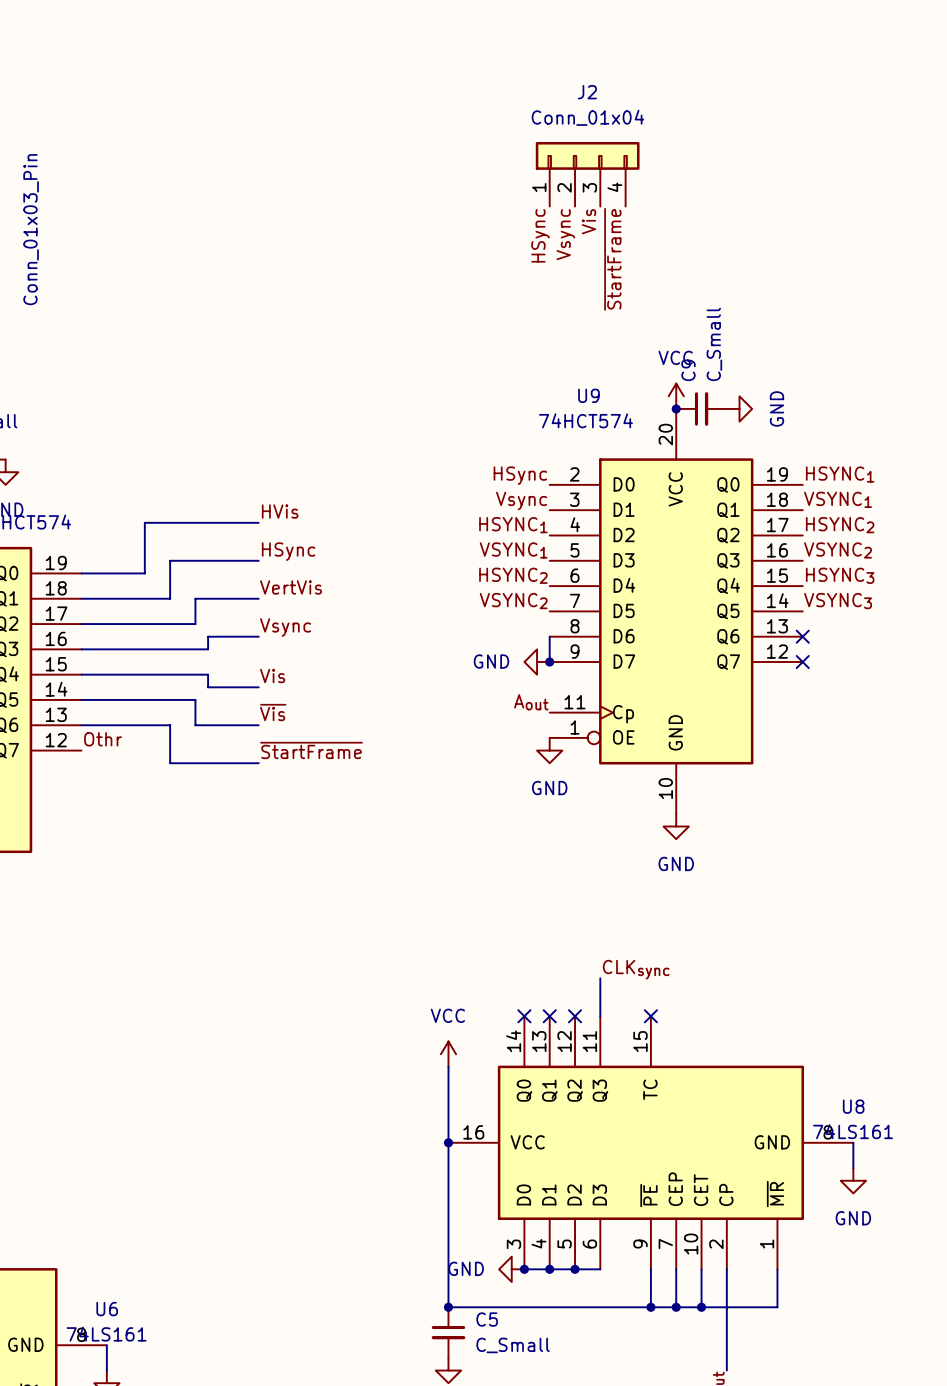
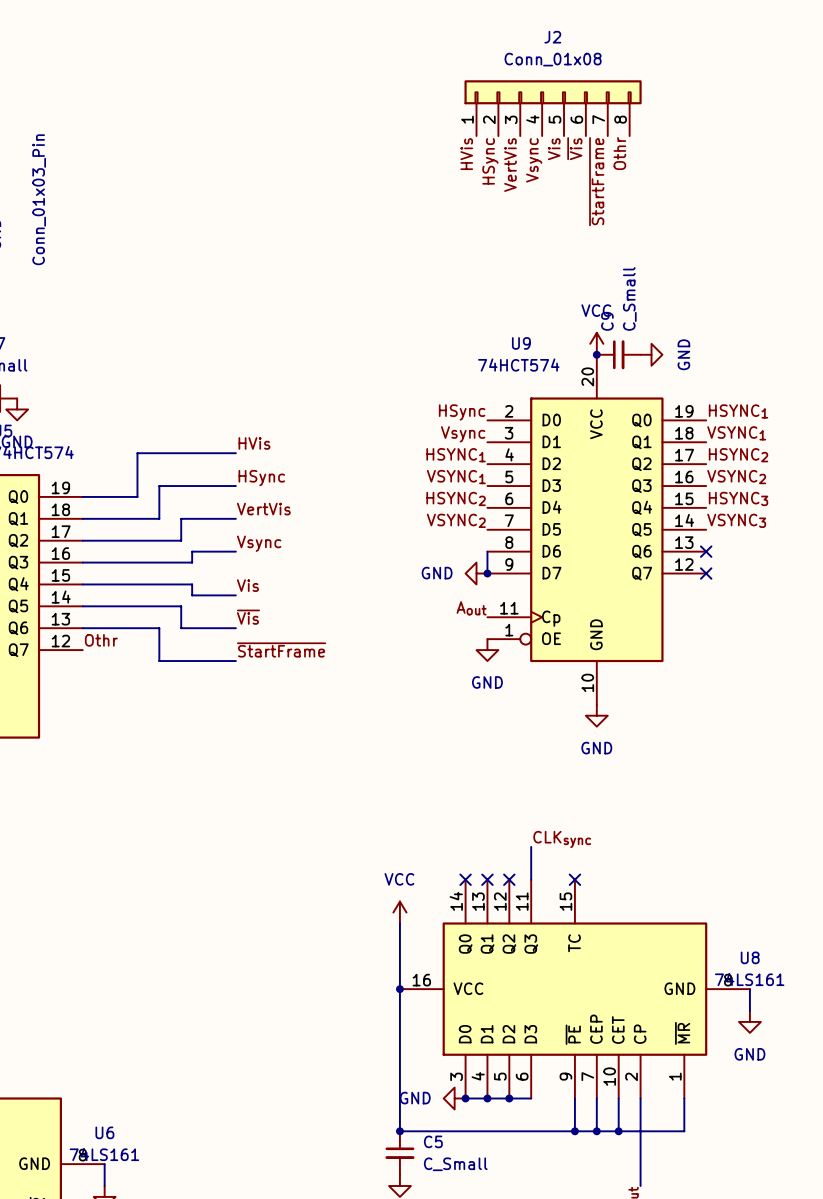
J2 value: Conn_01x04 (587, 117) -> Conn_01x08 (553, 59)
J2 symbol: [535, 142, 640, 207] -> [464, 80, 642, 137]
label: none -> ~{Vis} (574, 148)
label: none -> HVis (466, 154)
label: none -> Othr (619, 153)
label: none -> VertVis (510, 165)
label position: Vis (589, 221) -> Vis (554, 149)
label position: Vsync (565, 234) -> Vsync (534, 160)
label position: HSync (540, 235) -> HSync (490, 161)
label position: ~{StartFrame} (612, 259) -> ~{StartFrame} (596, 181)

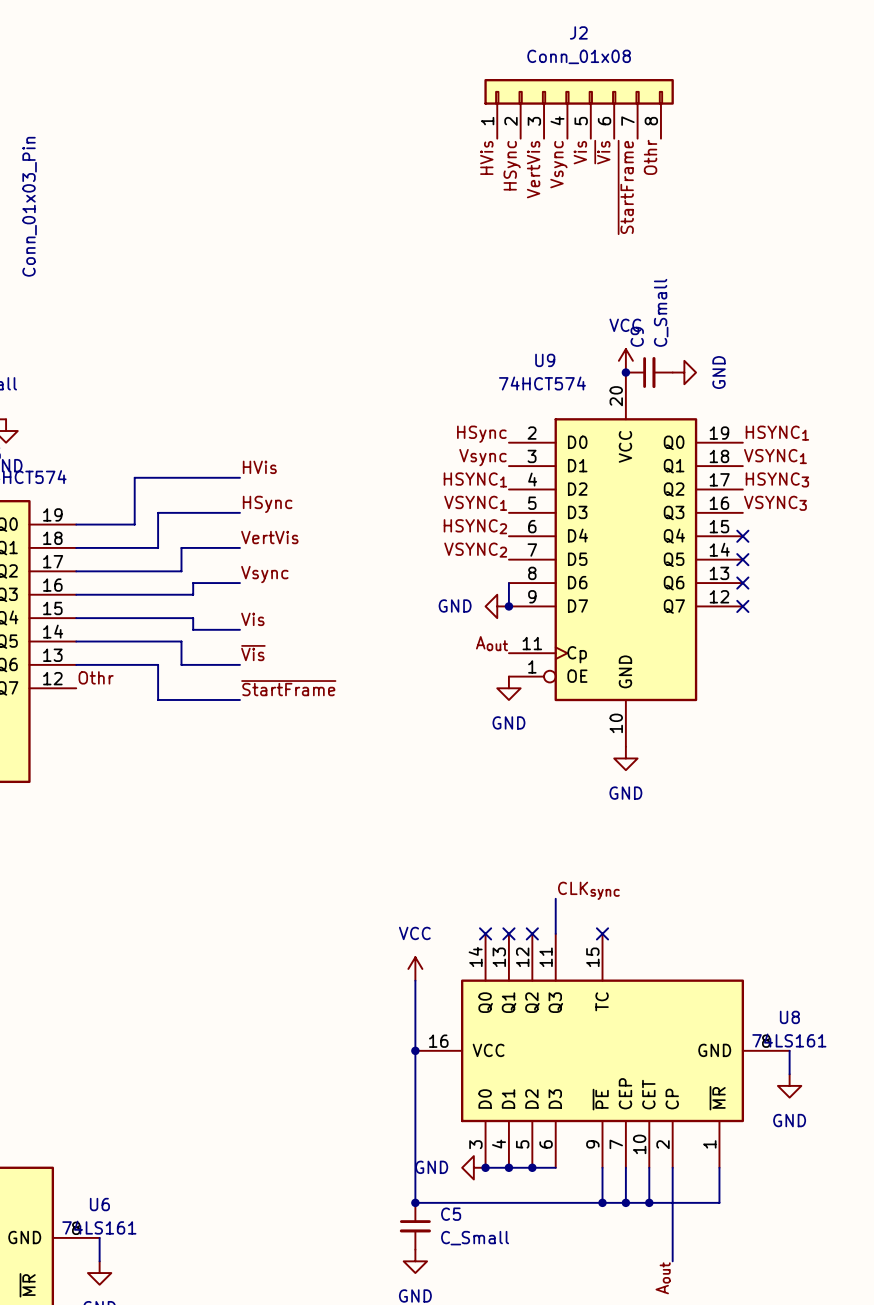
label: HSYNC2 (738, 455) -> HSYNC3 (777, 479)
label: VSYNC2 (736, 477) -> VSYNC3 (775, 503)
label: HSYNC3 (738, 498) -> none
no-connect mark: none -> (742, 536)
label: VSYNC3 (736, 520) -> none
no-connect mark: none -> (742, 559)

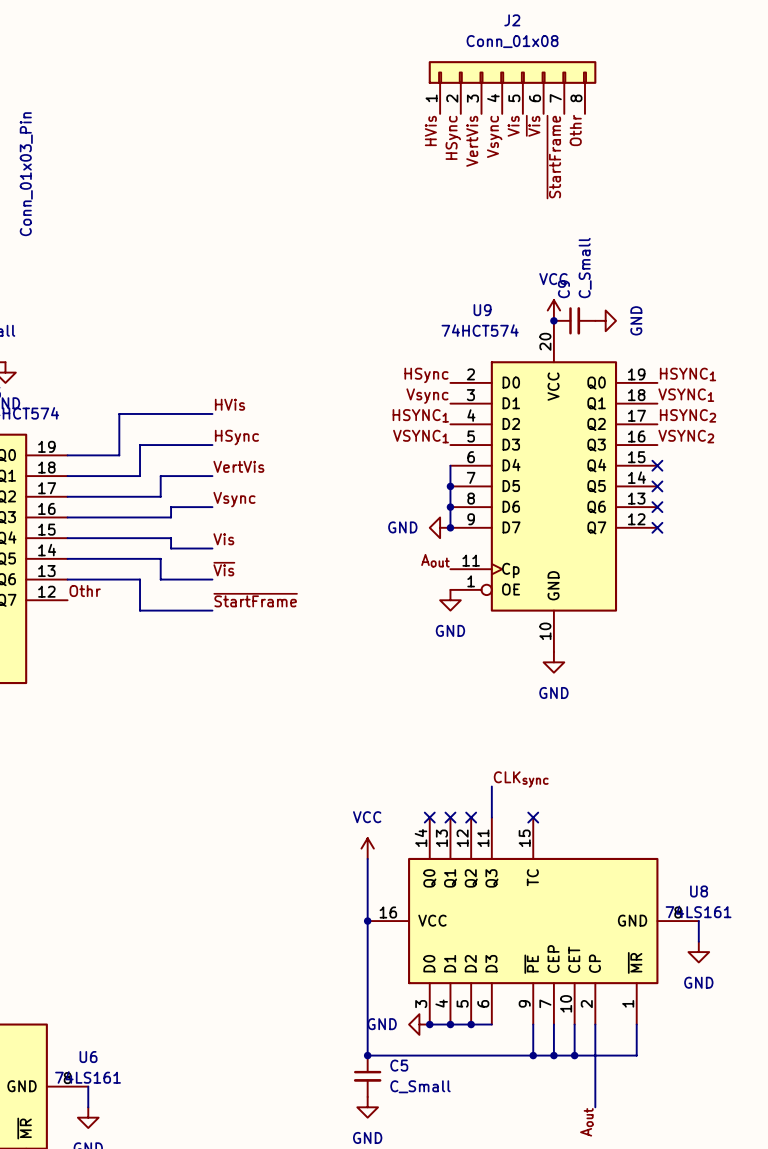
label: HSYNC3 (777, 479) -> HSYNC2 (688, 415)
label: VSYNC3 (775, 503) -> VSYNC2 (686, 436)
label: HSYNC2 (475, 526) -> none
wire: none -> (450, 465) (450, 507)
label: VSYNC2 (475, 550) -> none
junction: none -> (450, 486)
junction: none -> (450, 507)

